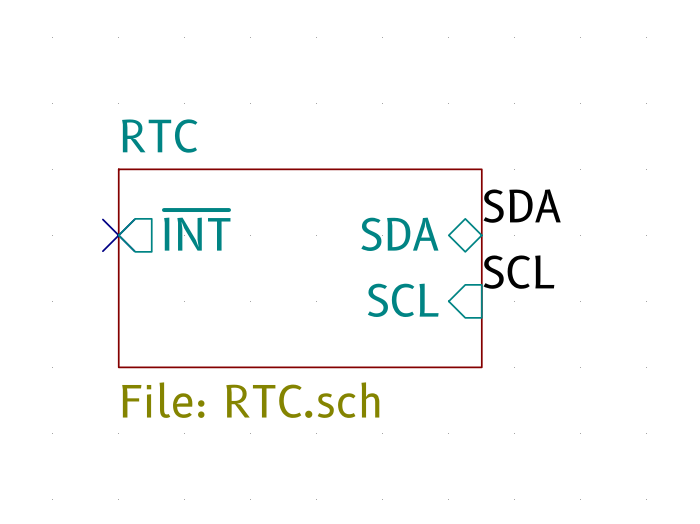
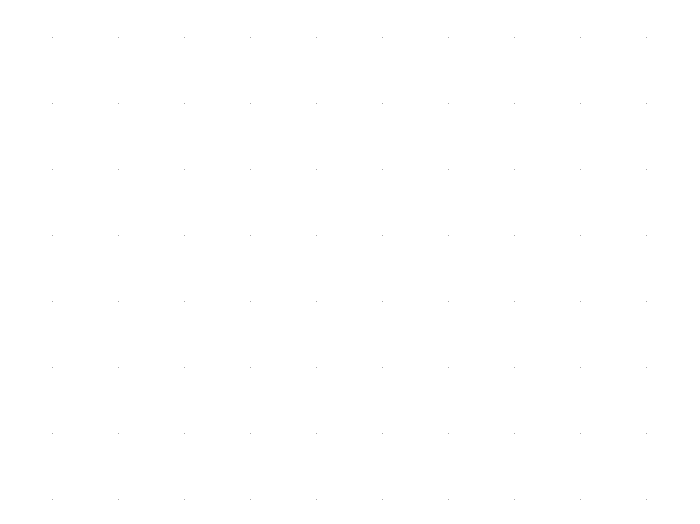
label: SDA (522, 206) -> none
sheet pin: ~{INT} (197, 230) -> none
sheet pin: SDA (399, 234) -> none
no-connect mark: (118, 235) -> none
sheet RTC: File: RTC.sch (300, 268) -> none
label: SCL (518, 272) -> none
sheet pin: SCL (403, 300) -> none

